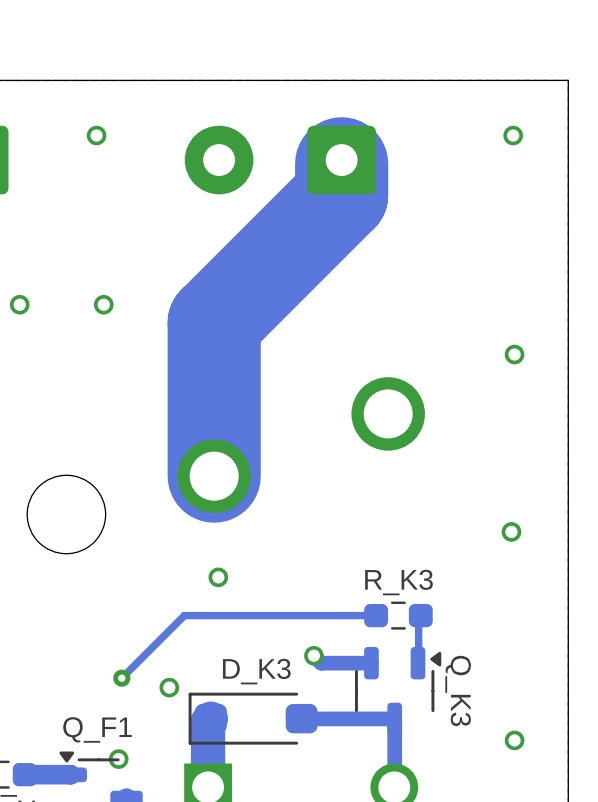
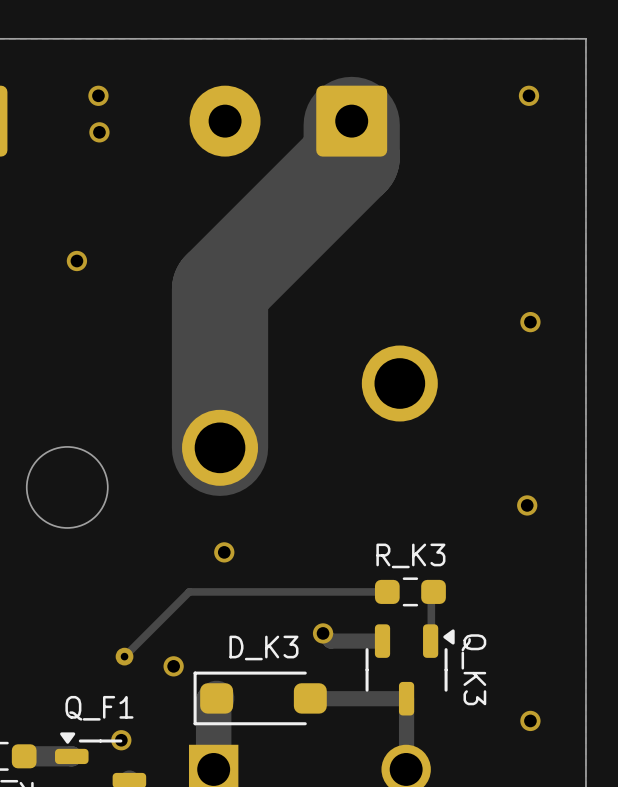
via: none -> (99, 132)
via: none -> (76, 261)
via: (19, 304) -> none
via: (103, 304) -> none

